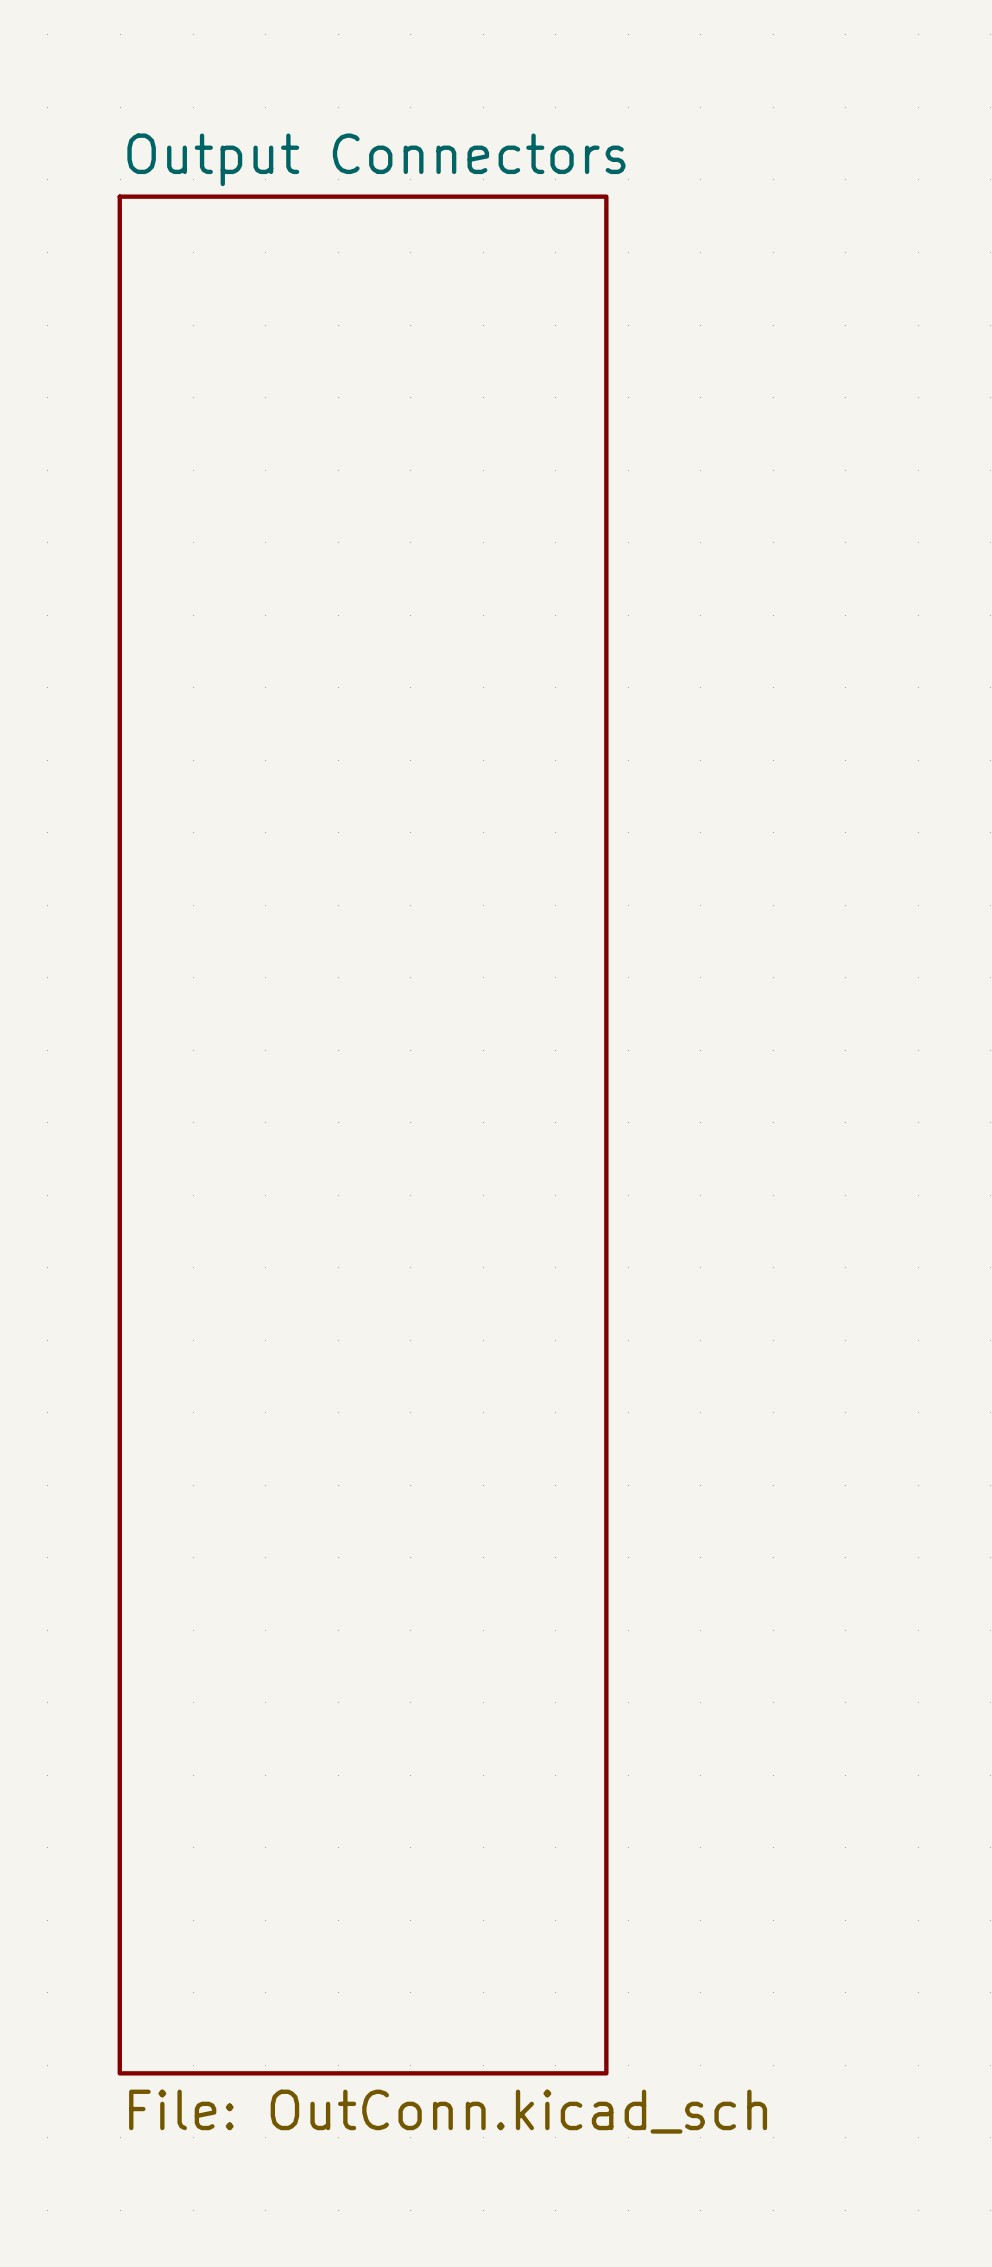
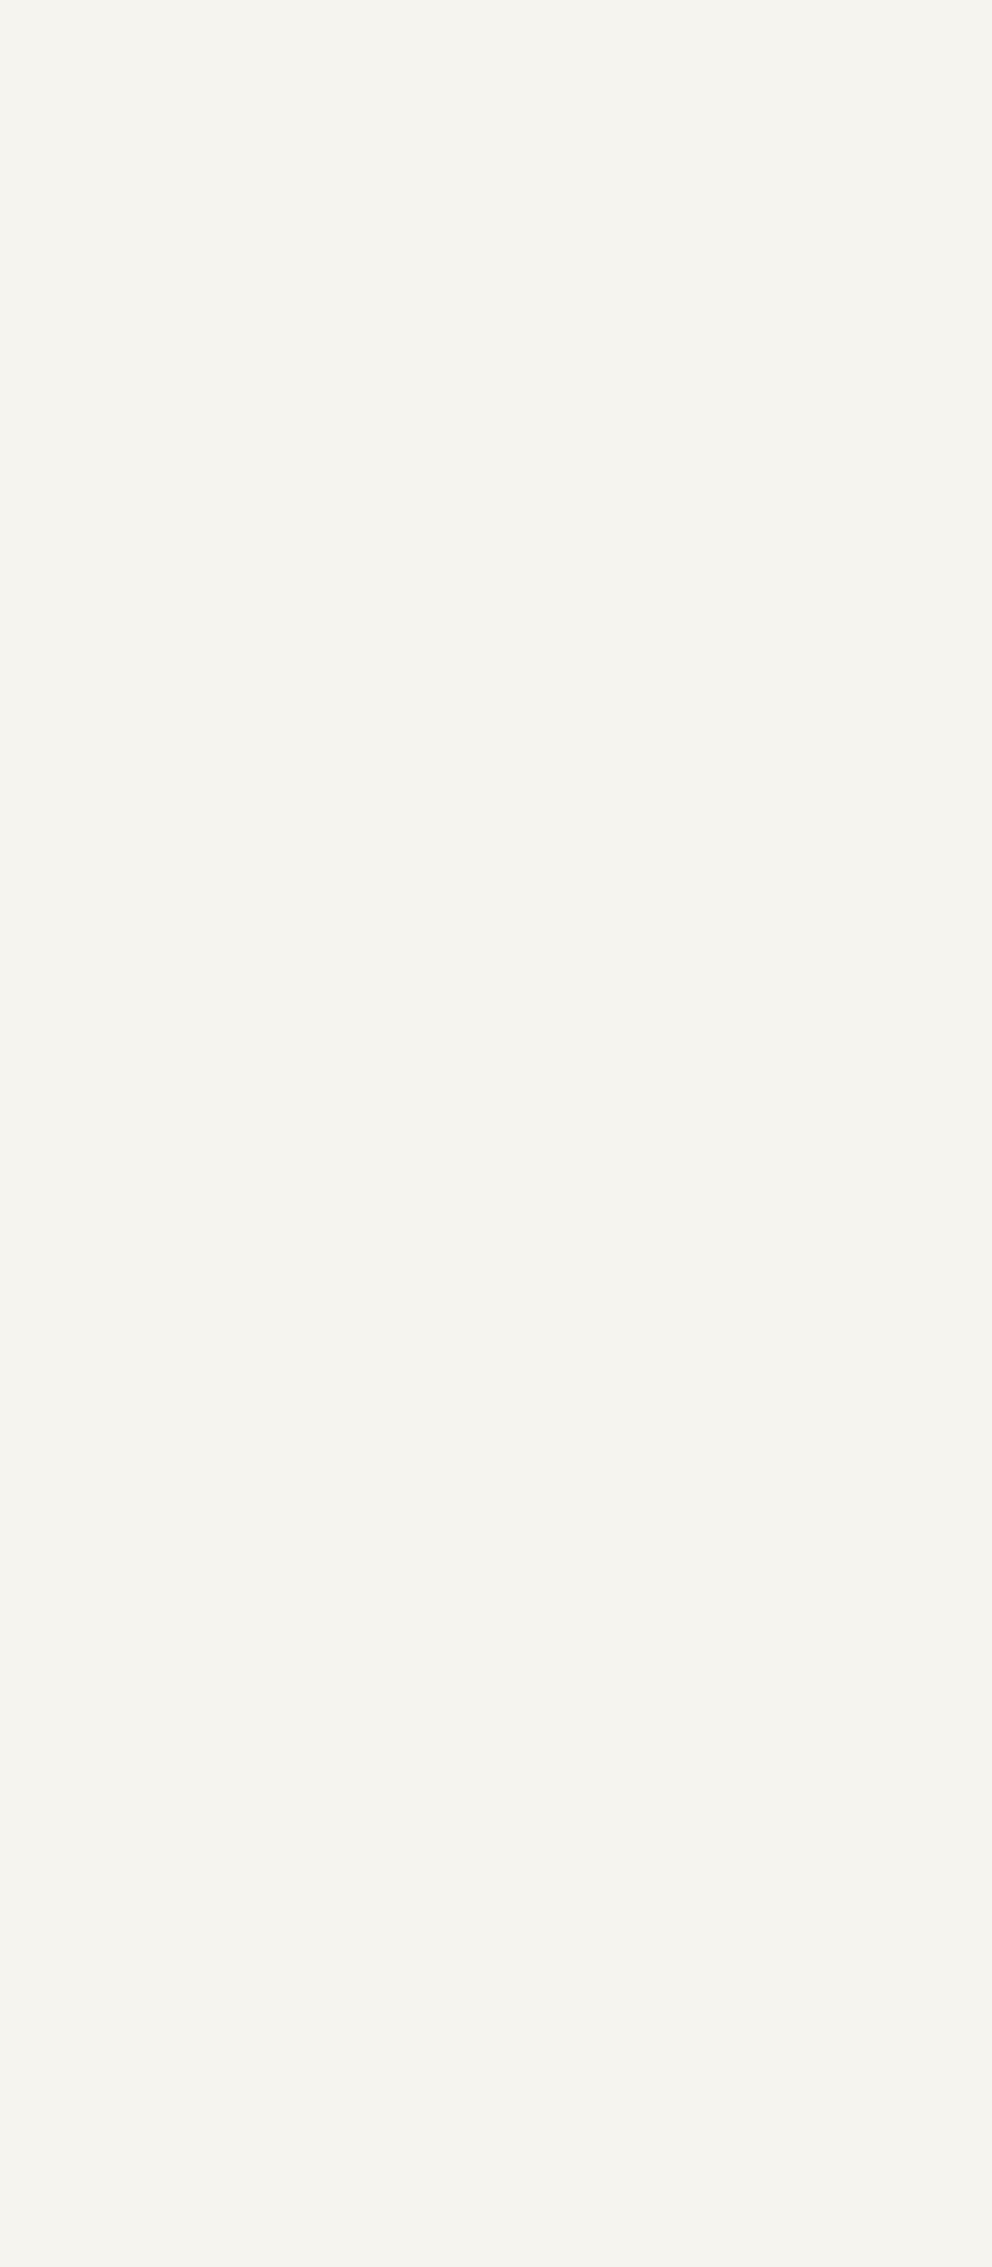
sheet Output Connectors: File: OutConn.kicad_sch (363, 1135) -> none

